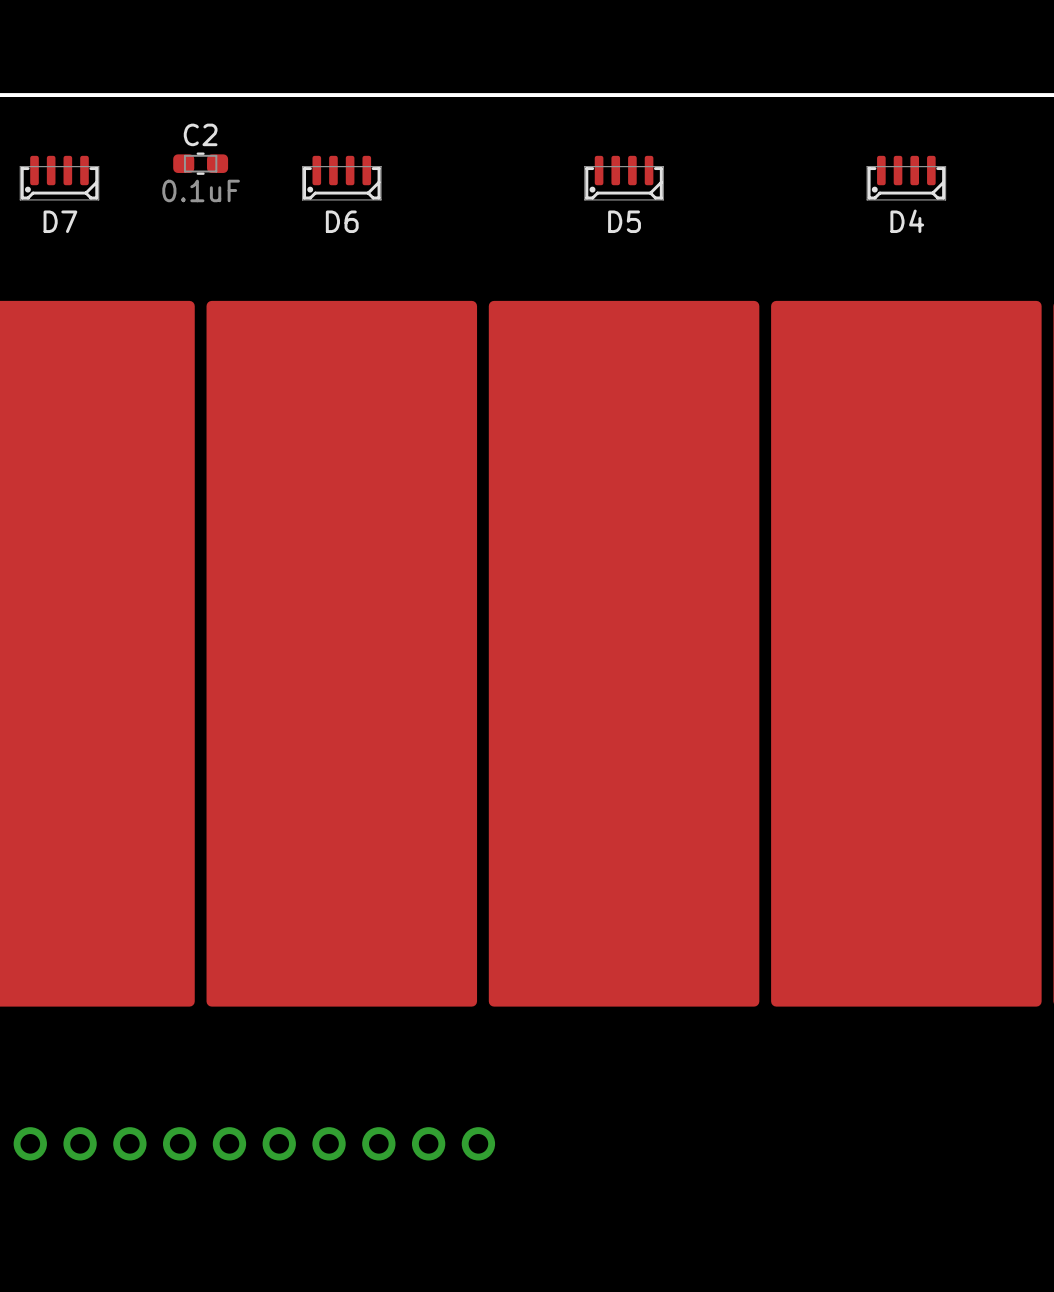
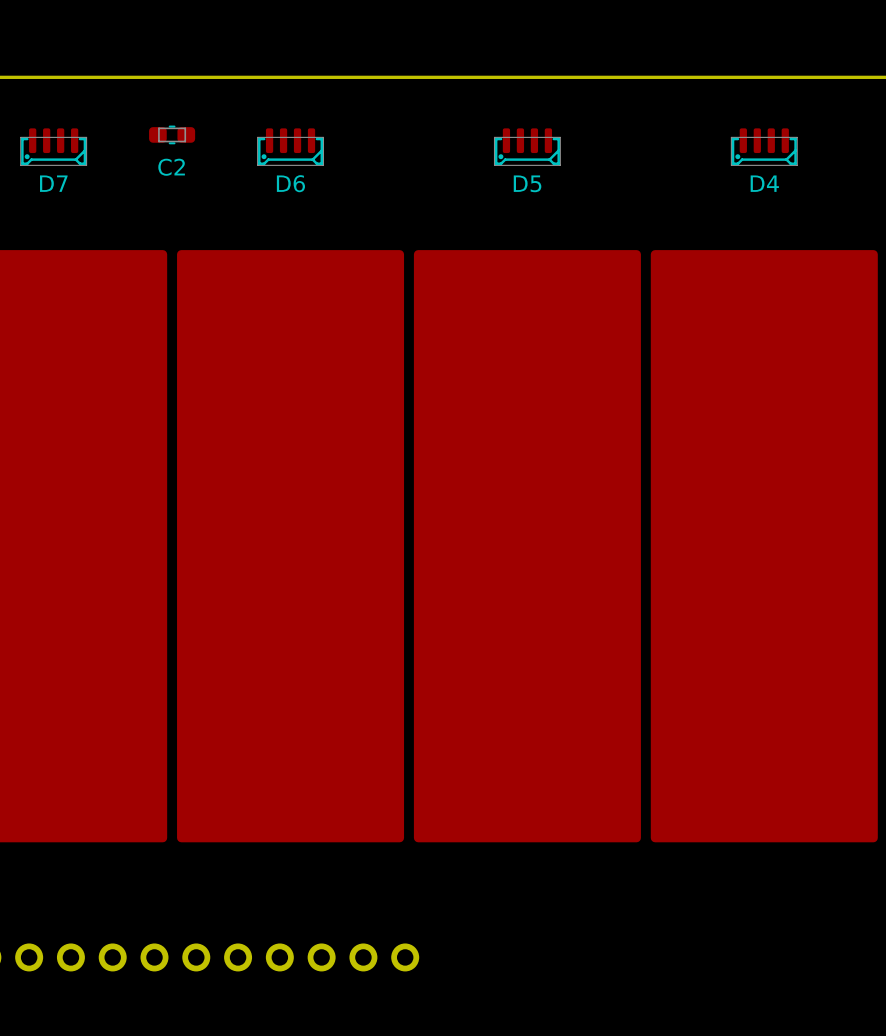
C2 name position: C2 (200, 134) -> C2 (171, 167)
C2 value: 0.1uF (201, 190) -> none

